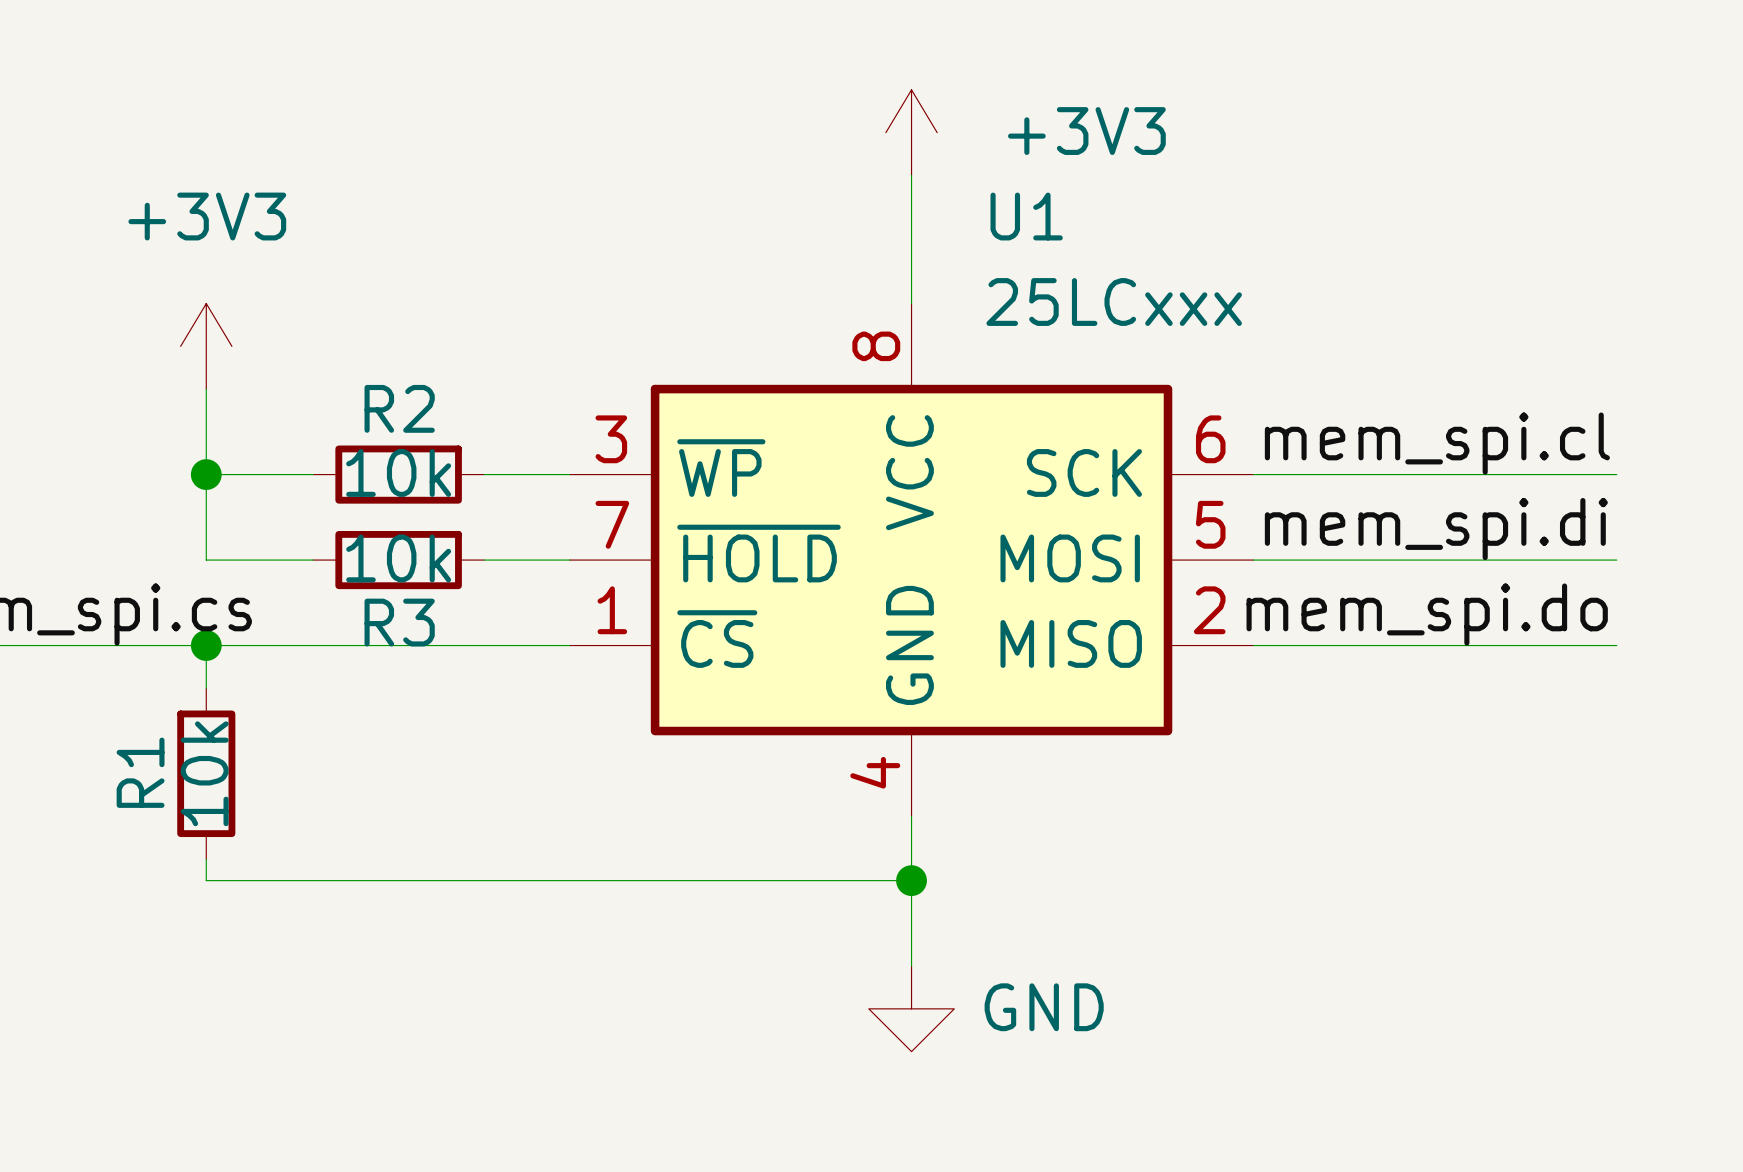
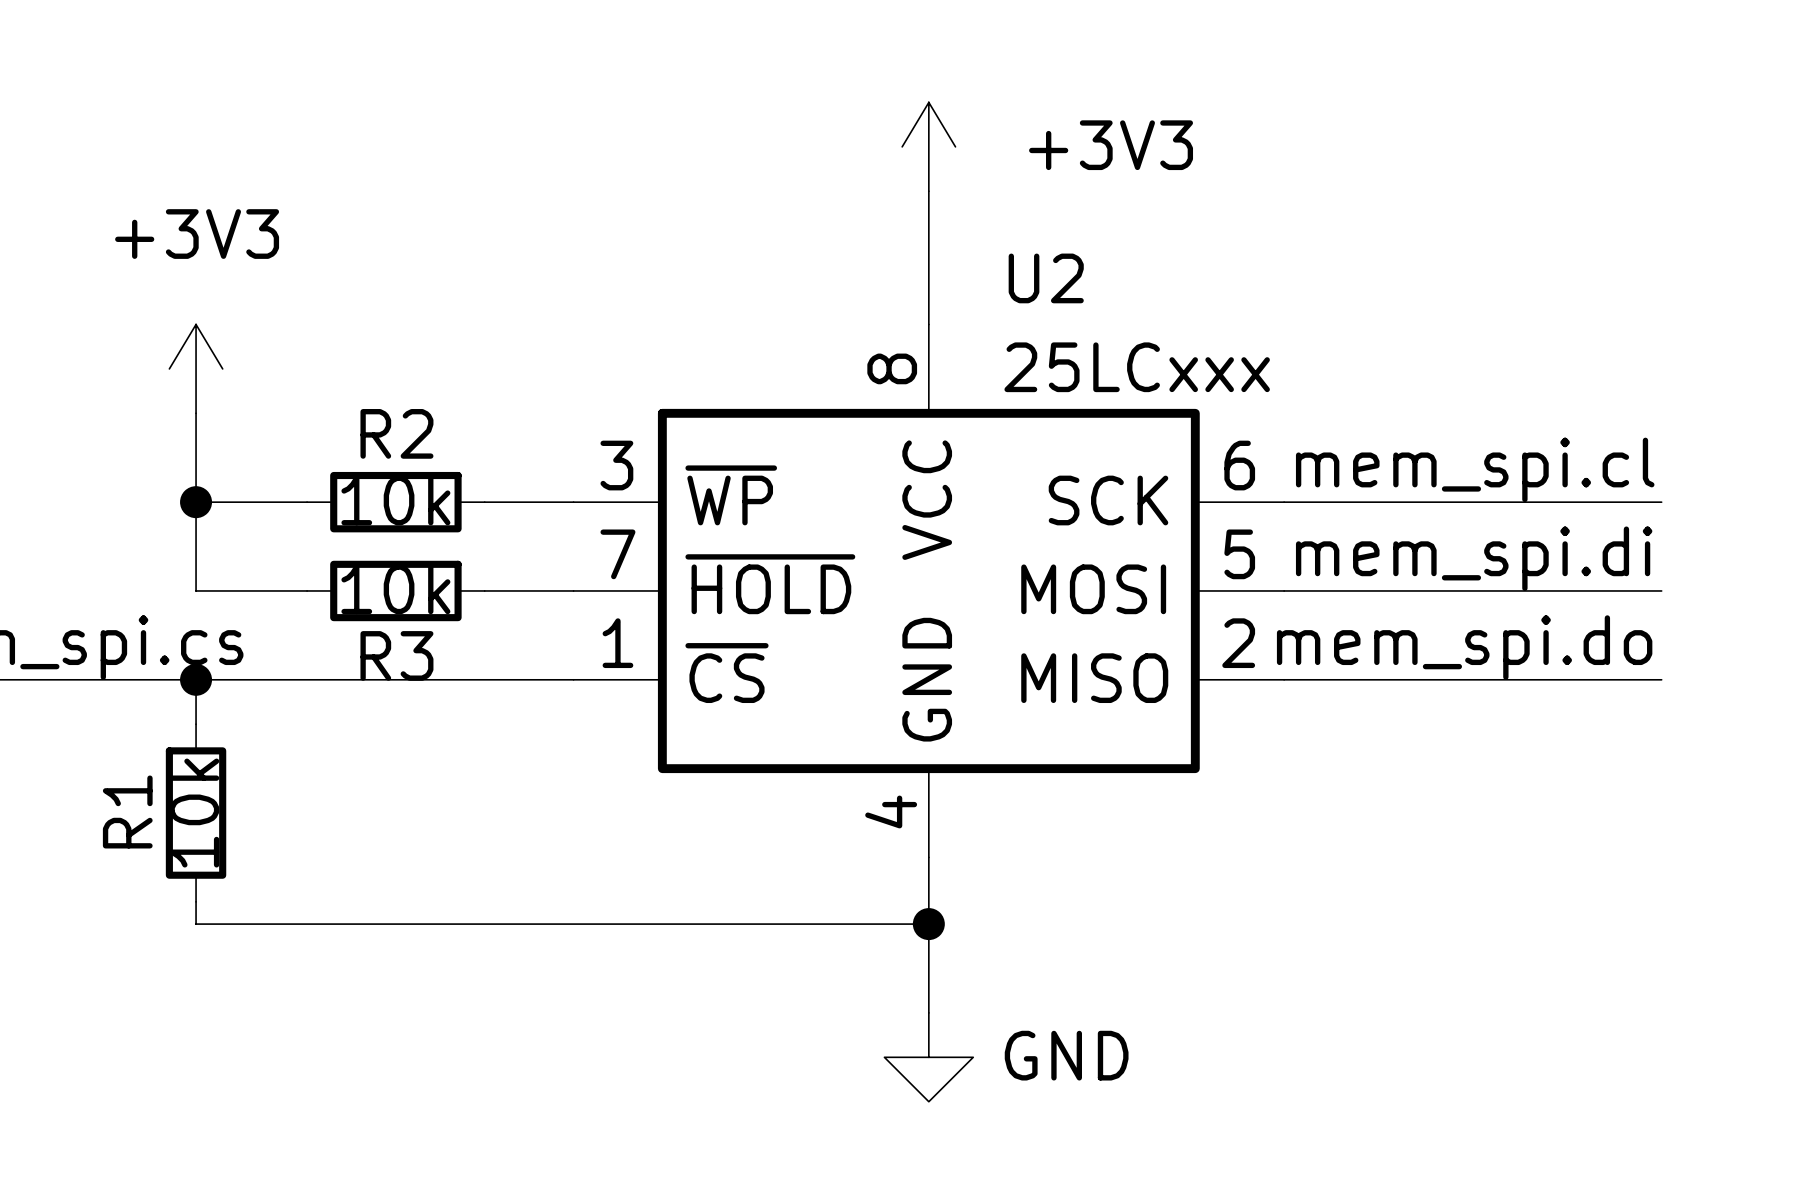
U1 name: U1 (1026, 216) -> U2 (1046, 278)
U1 value position: 25LCxxx (1114, 302) -> 25LCxxx (1137, 367)

